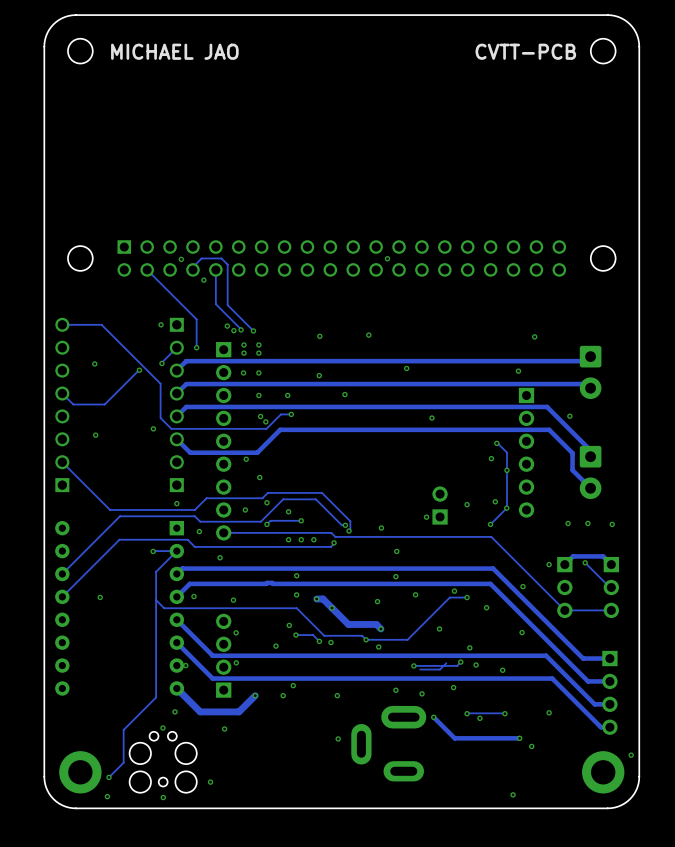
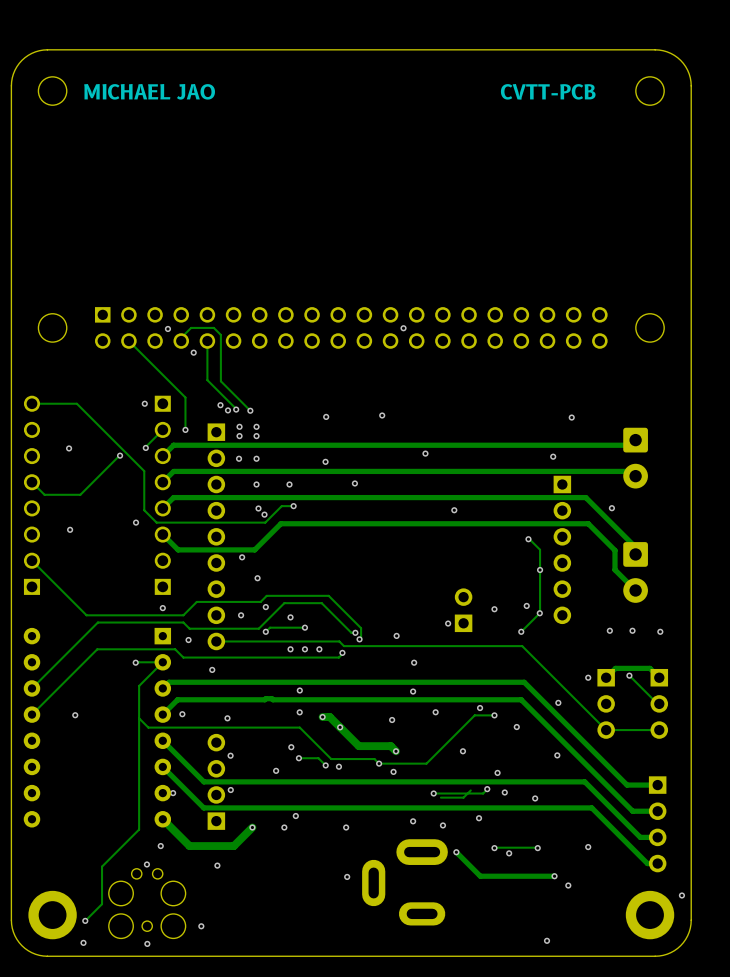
via: (491, 458) -> none

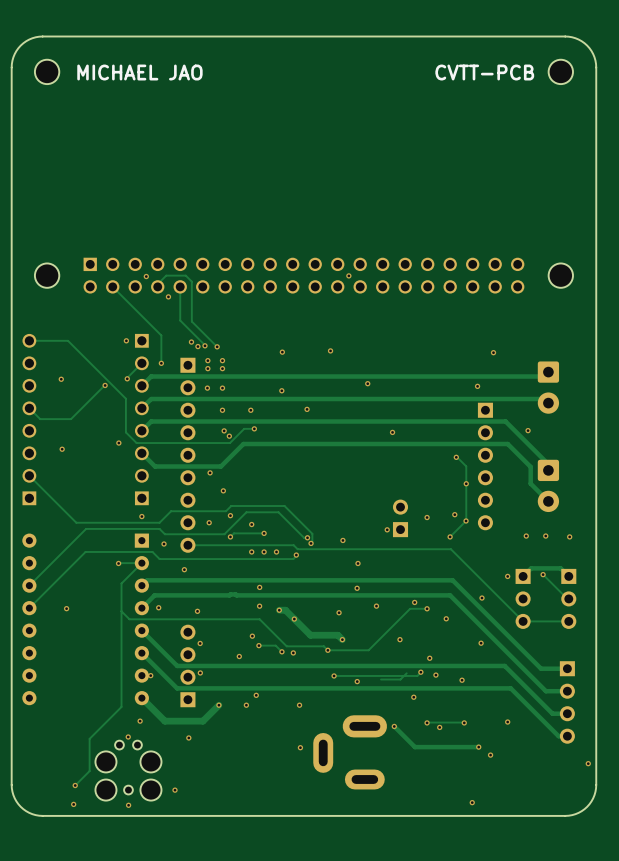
via: (393, 771) -> none
via: none -> (334, 675)
track: none -> (374, 675) (334, 675)
via: (433, 793) -> none
via: none -> (357, 681)
via: (413, 821) -> none
via: (442, 825) -> none
part: (52, 915) -> none
part: (650, 915) -> none

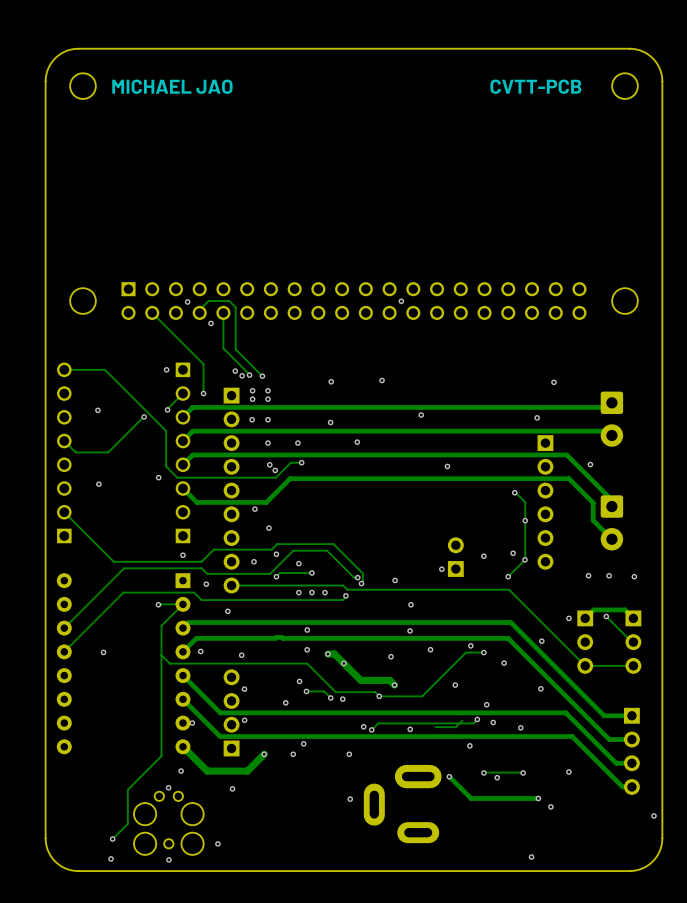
track: none -> (385, 723) (378, 723) (371, 729)
via: (334, 675) -> none
via: none -> (363, 726)
via: none -> (371, 729)

